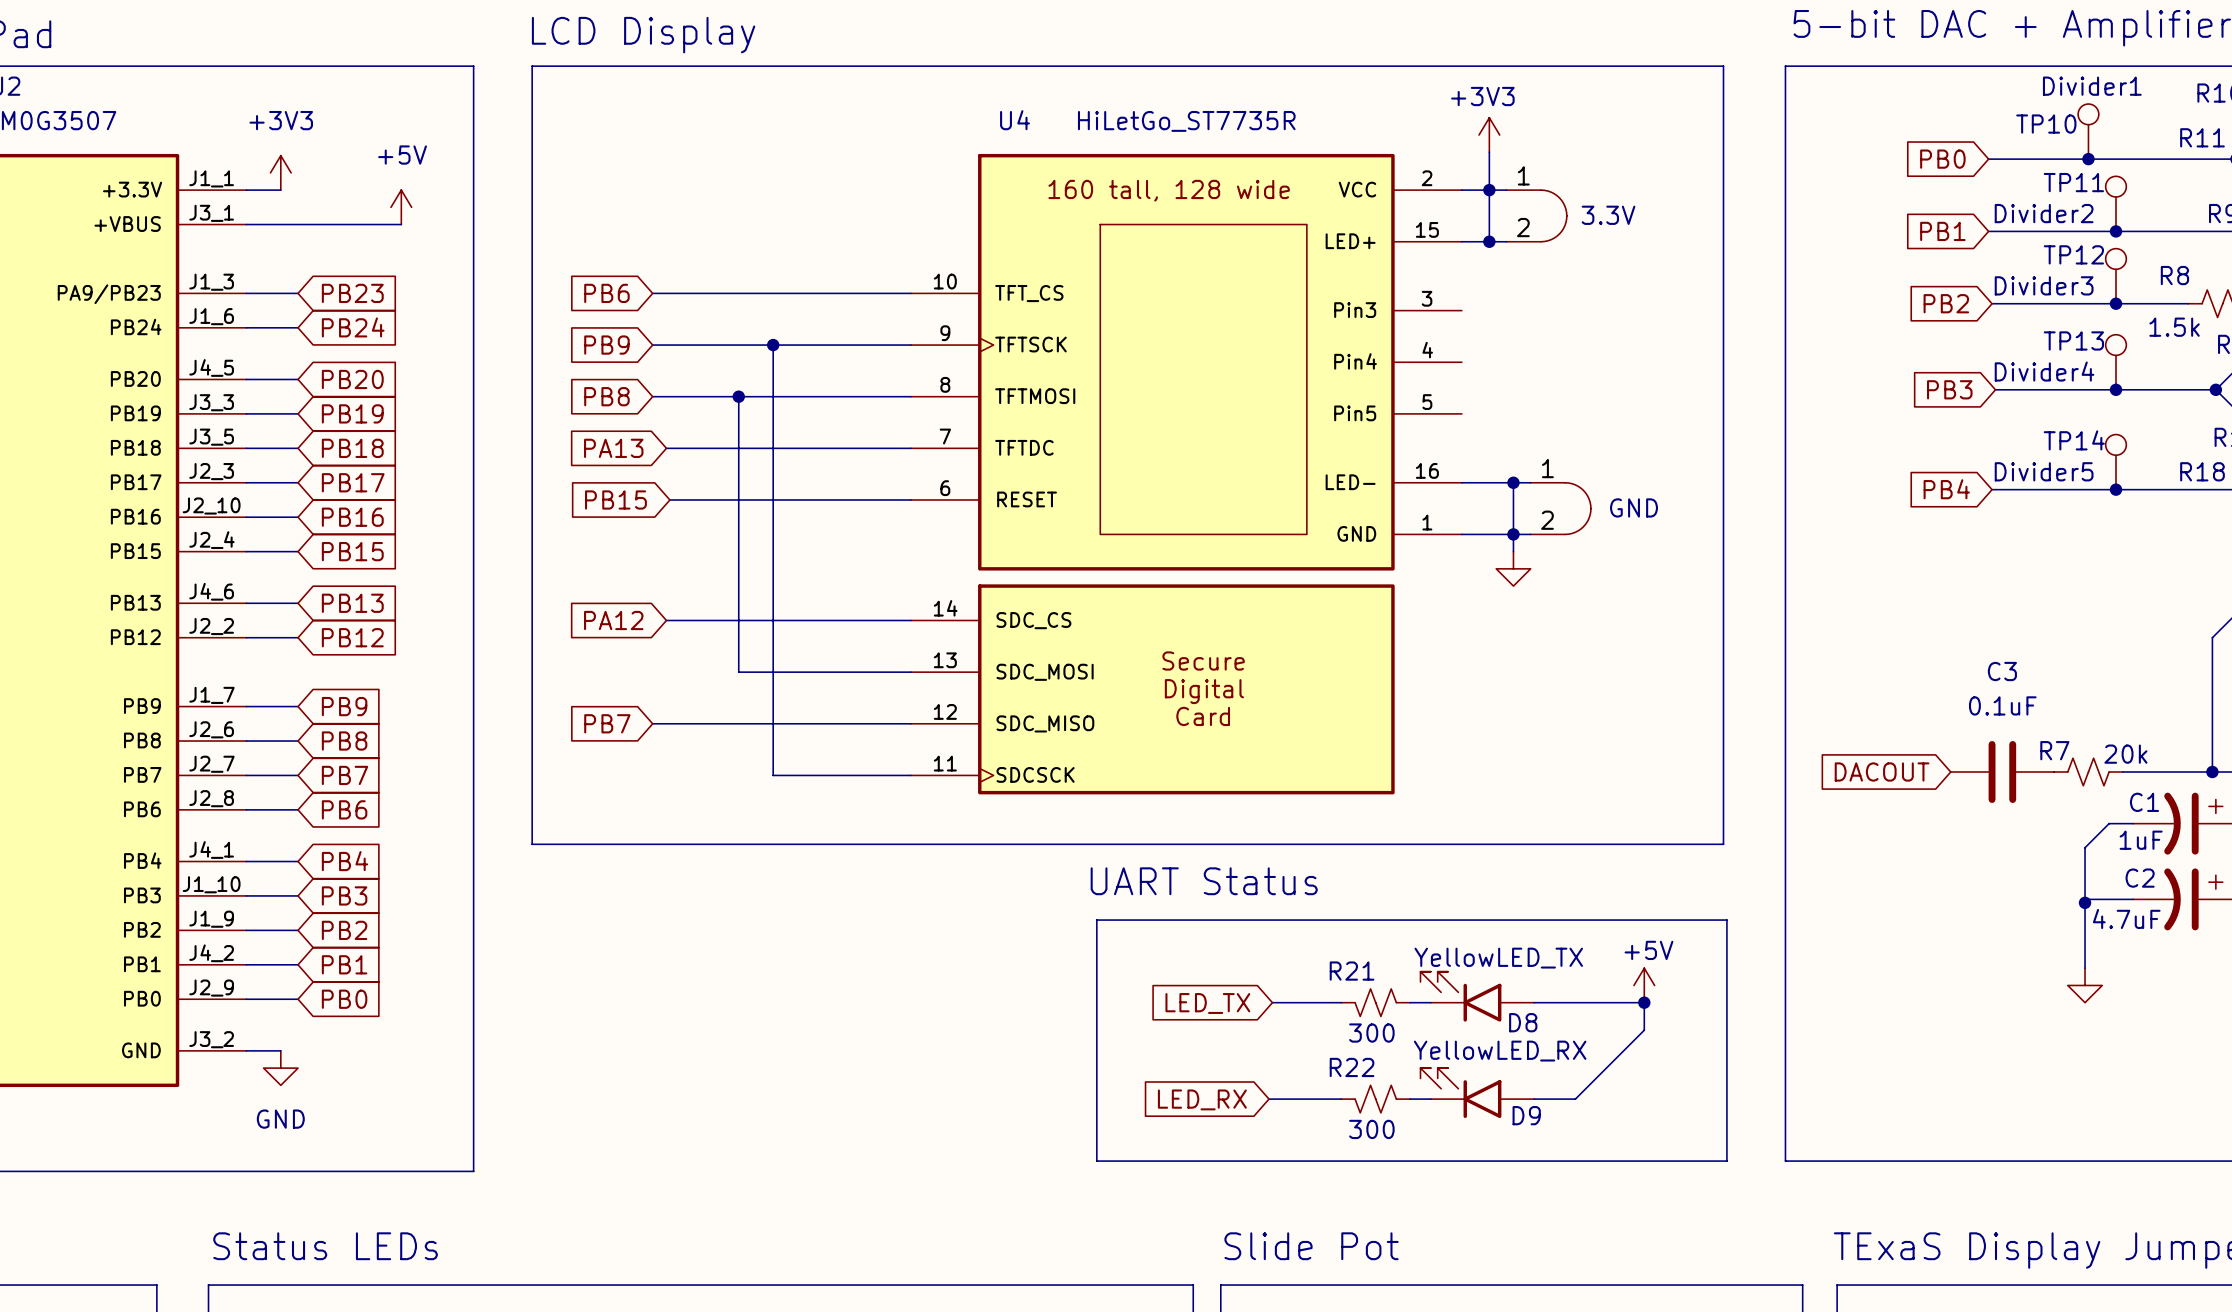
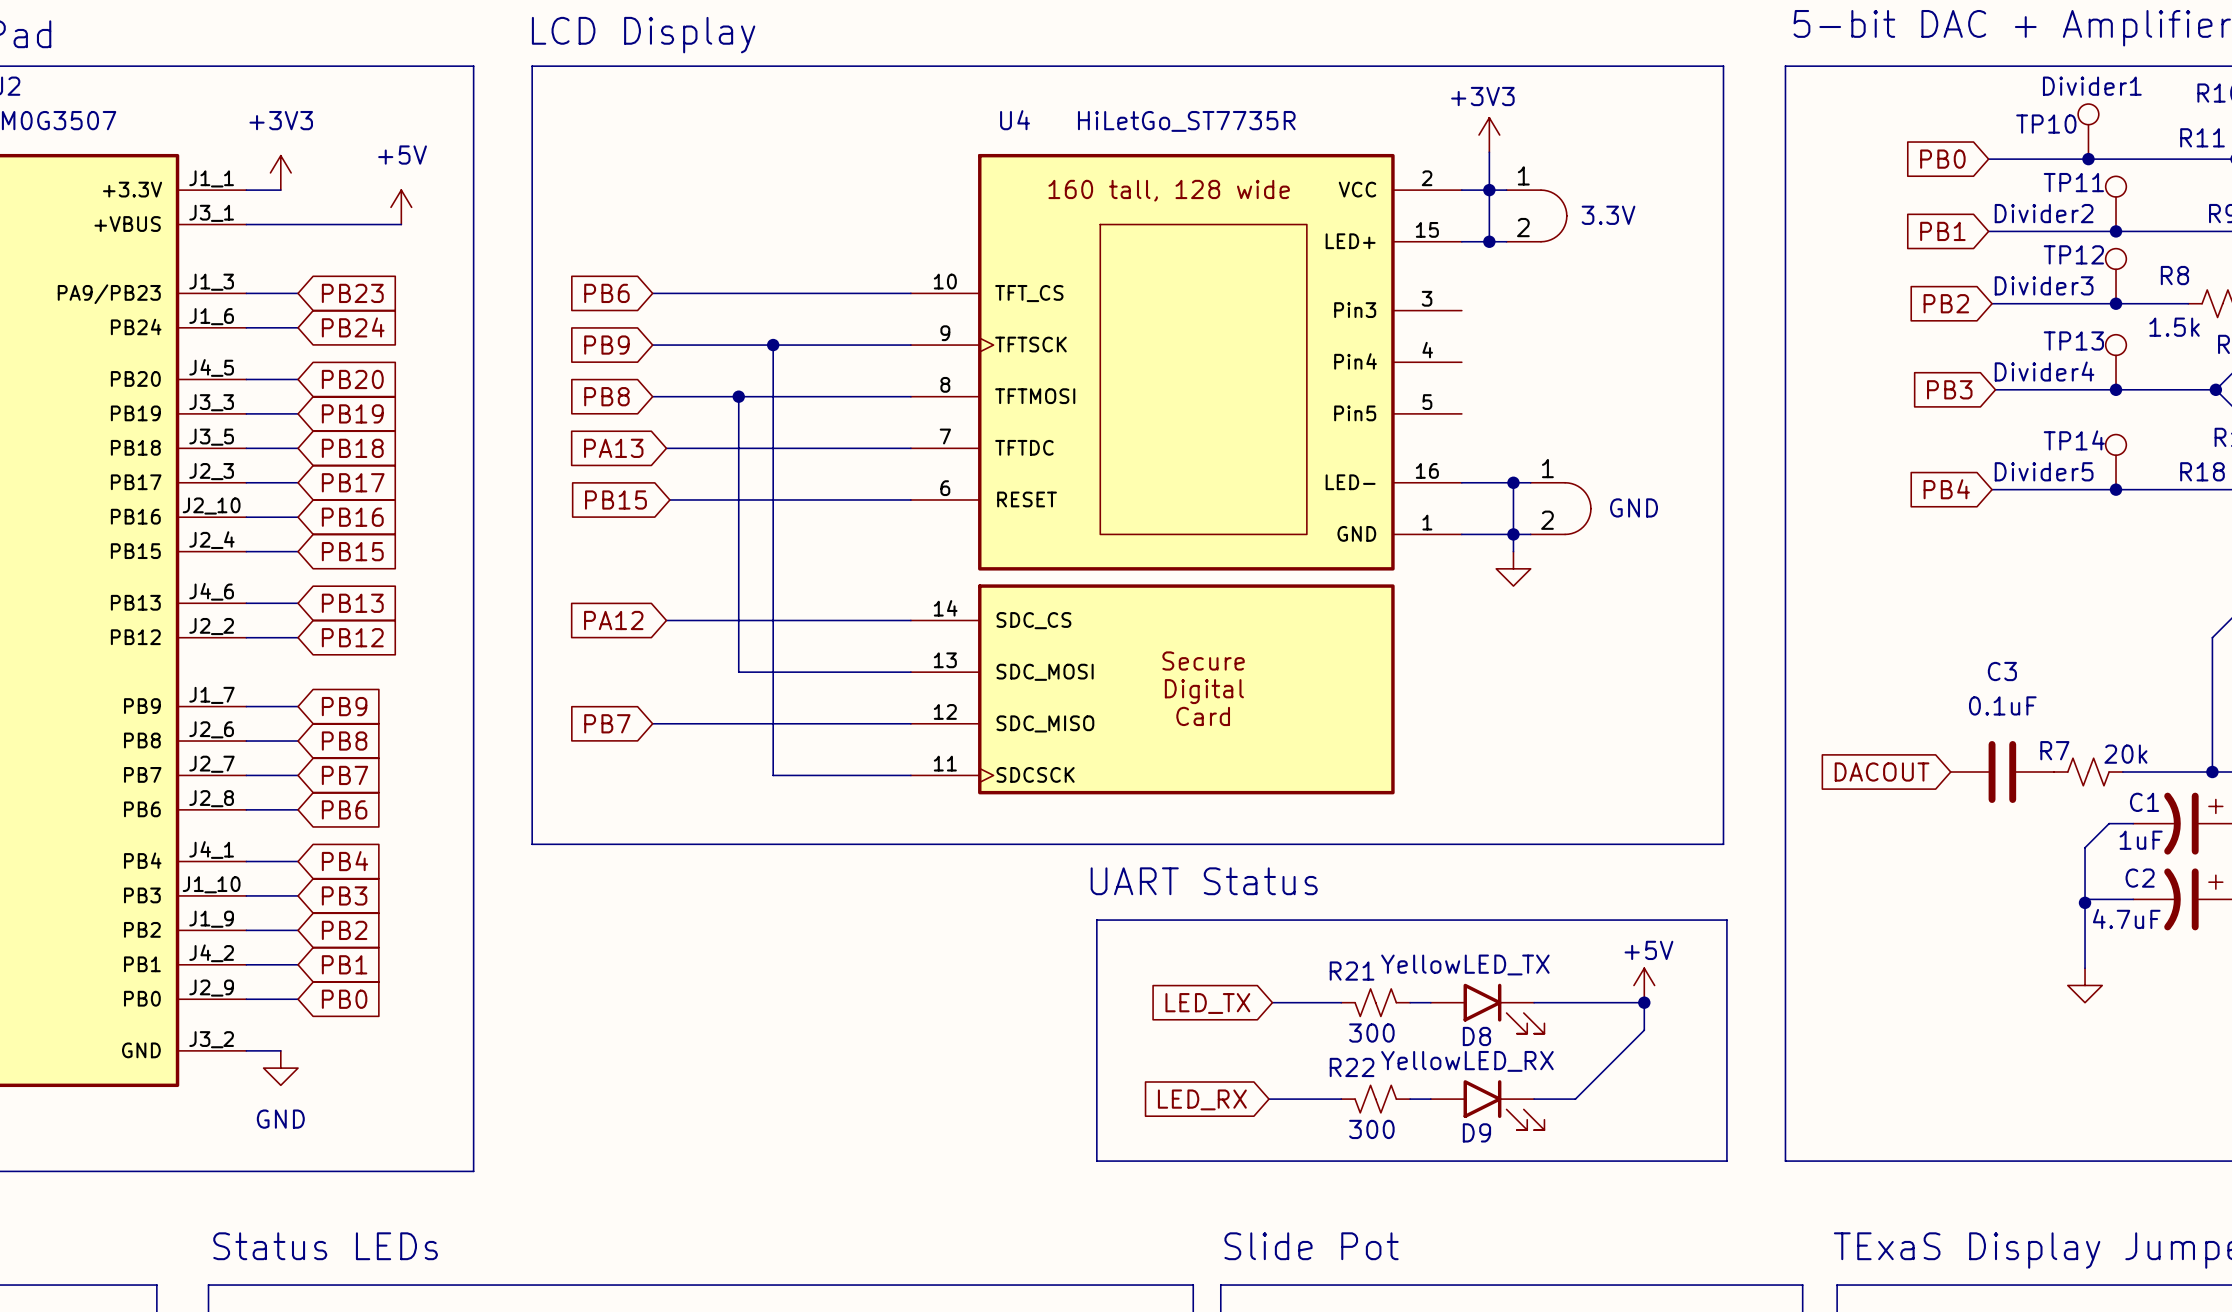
D8 rotation: 0° (1460, 996) -> 180° (1503, 1008)
D8 name position: D8 (1523, 1022) -> D8 (1476, 1036)
D9 rotation: 0° (1460, 1093) -> 180° (1503, 1105)
D9 name position: D9 (1526, 1115) -> D9 (1476, 1132)

